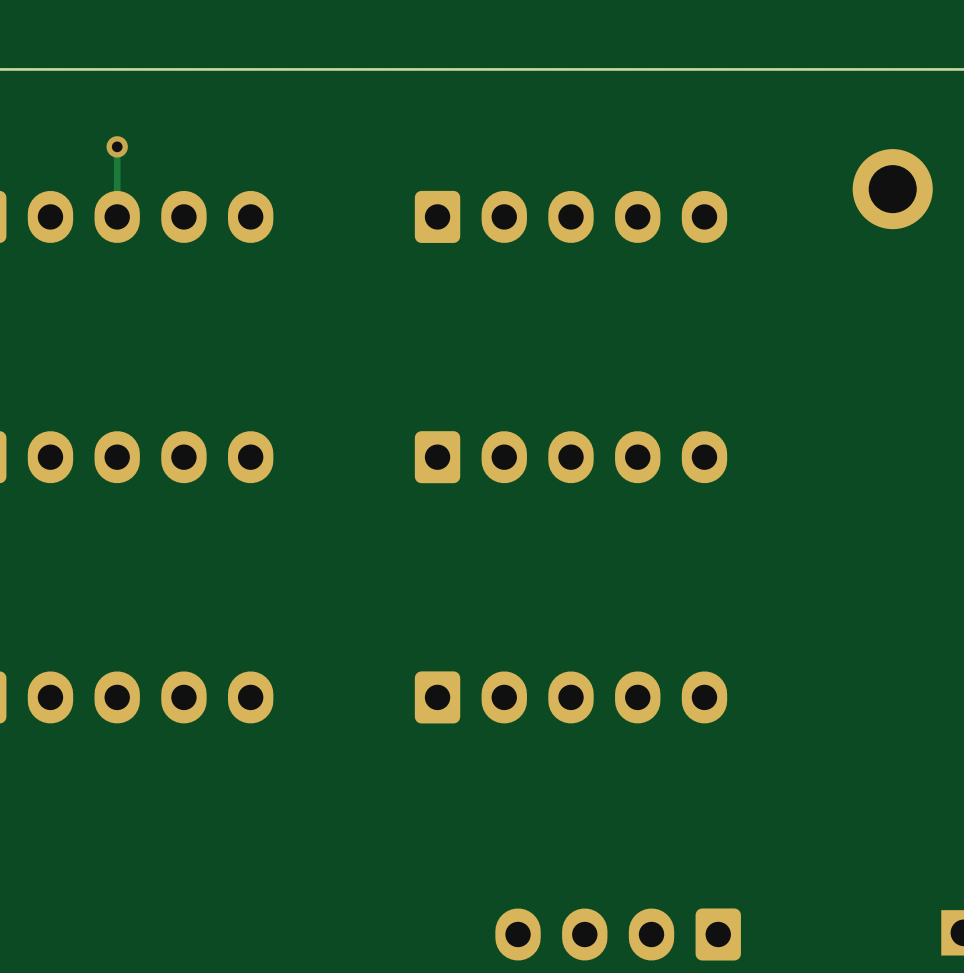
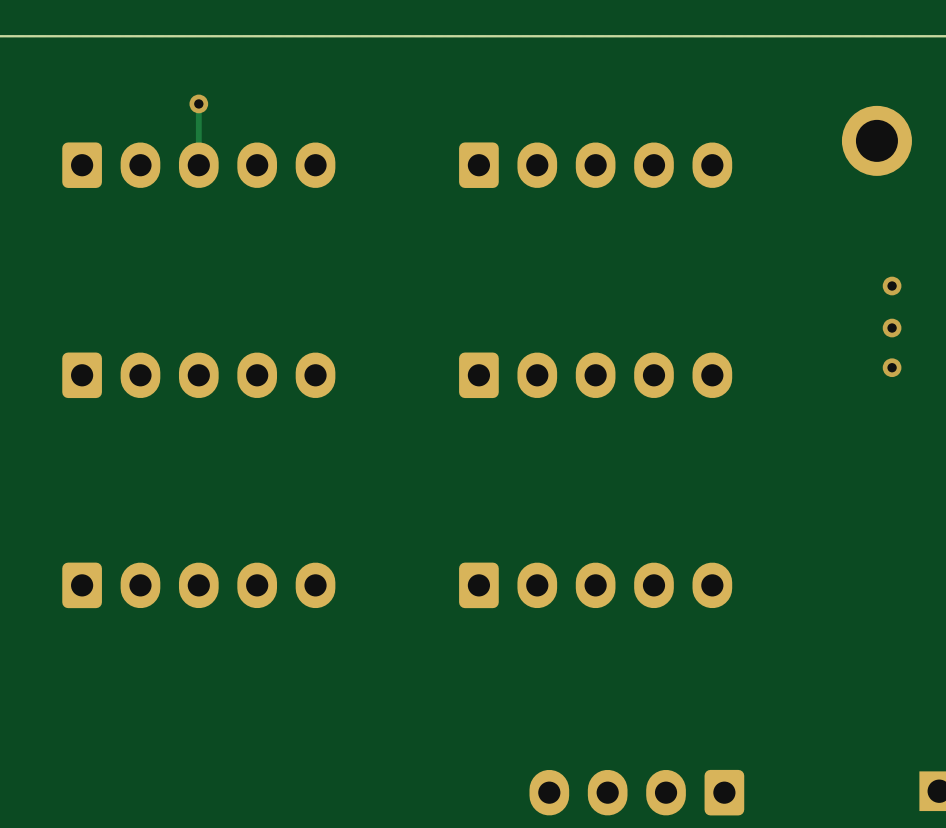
via: none -> (892, 286)
via: none -> (892, 328)
via: none -> (892, 367)

